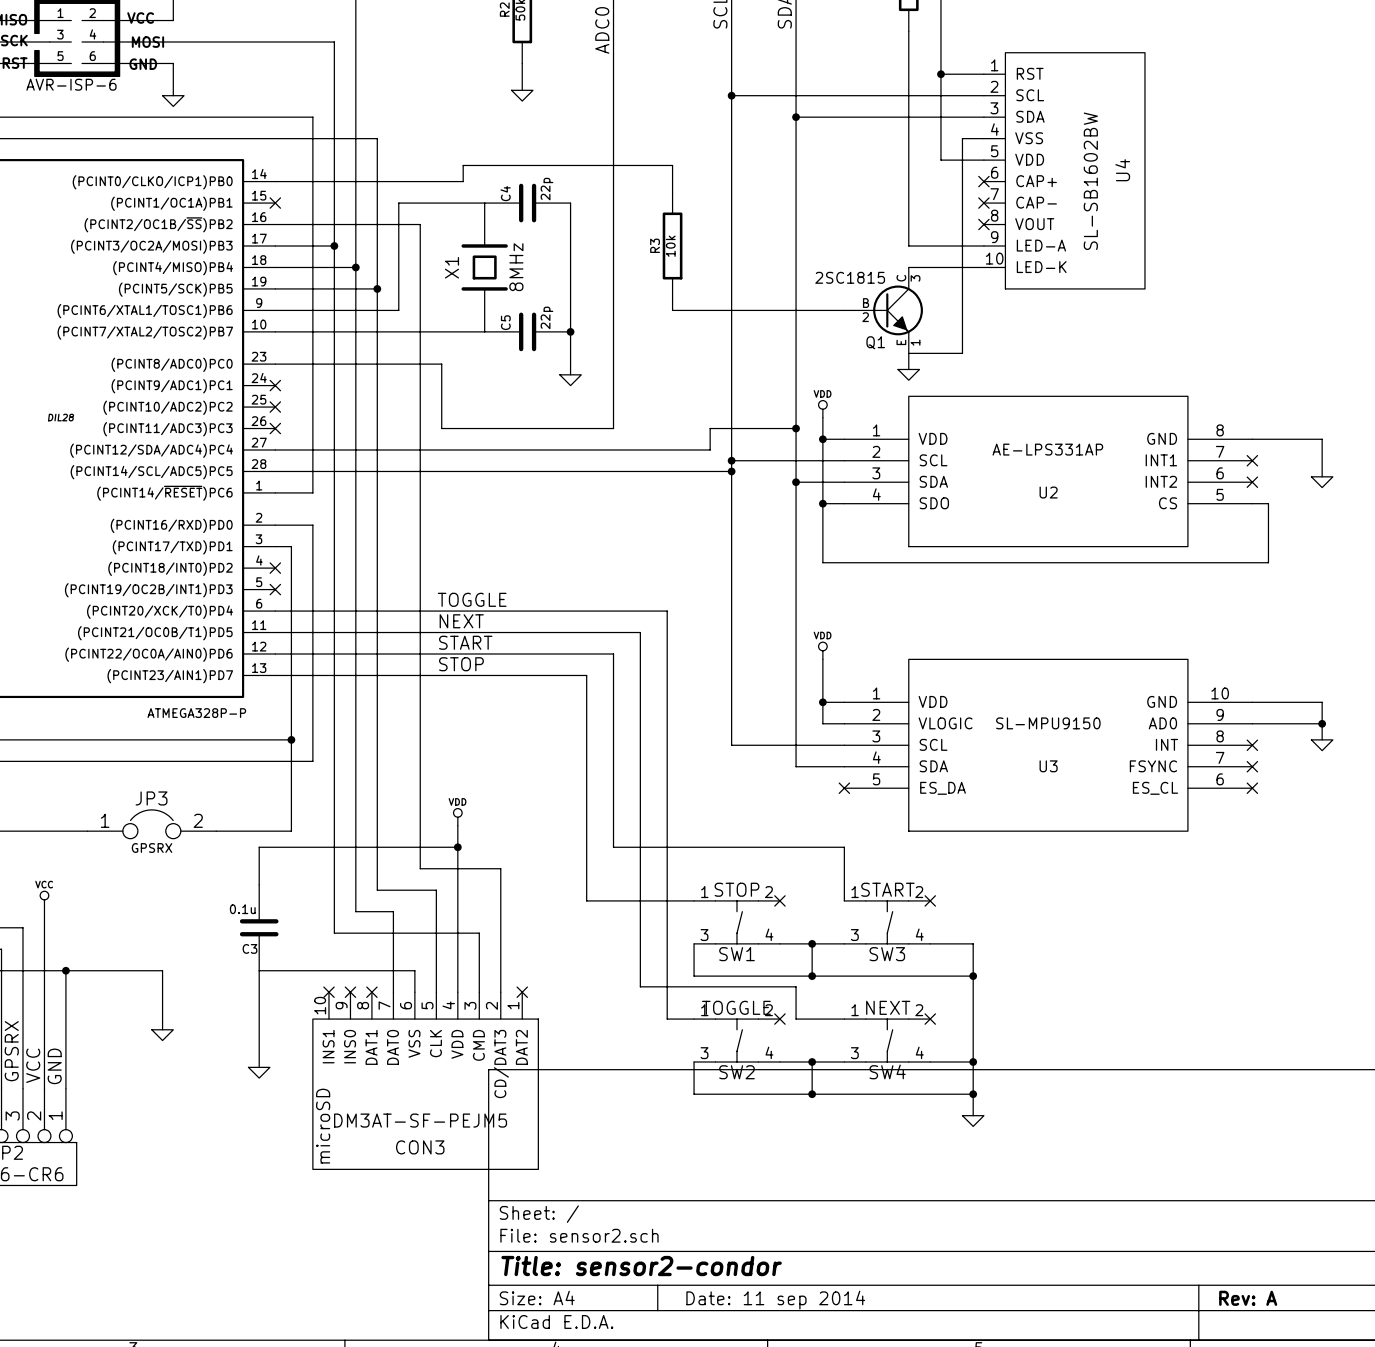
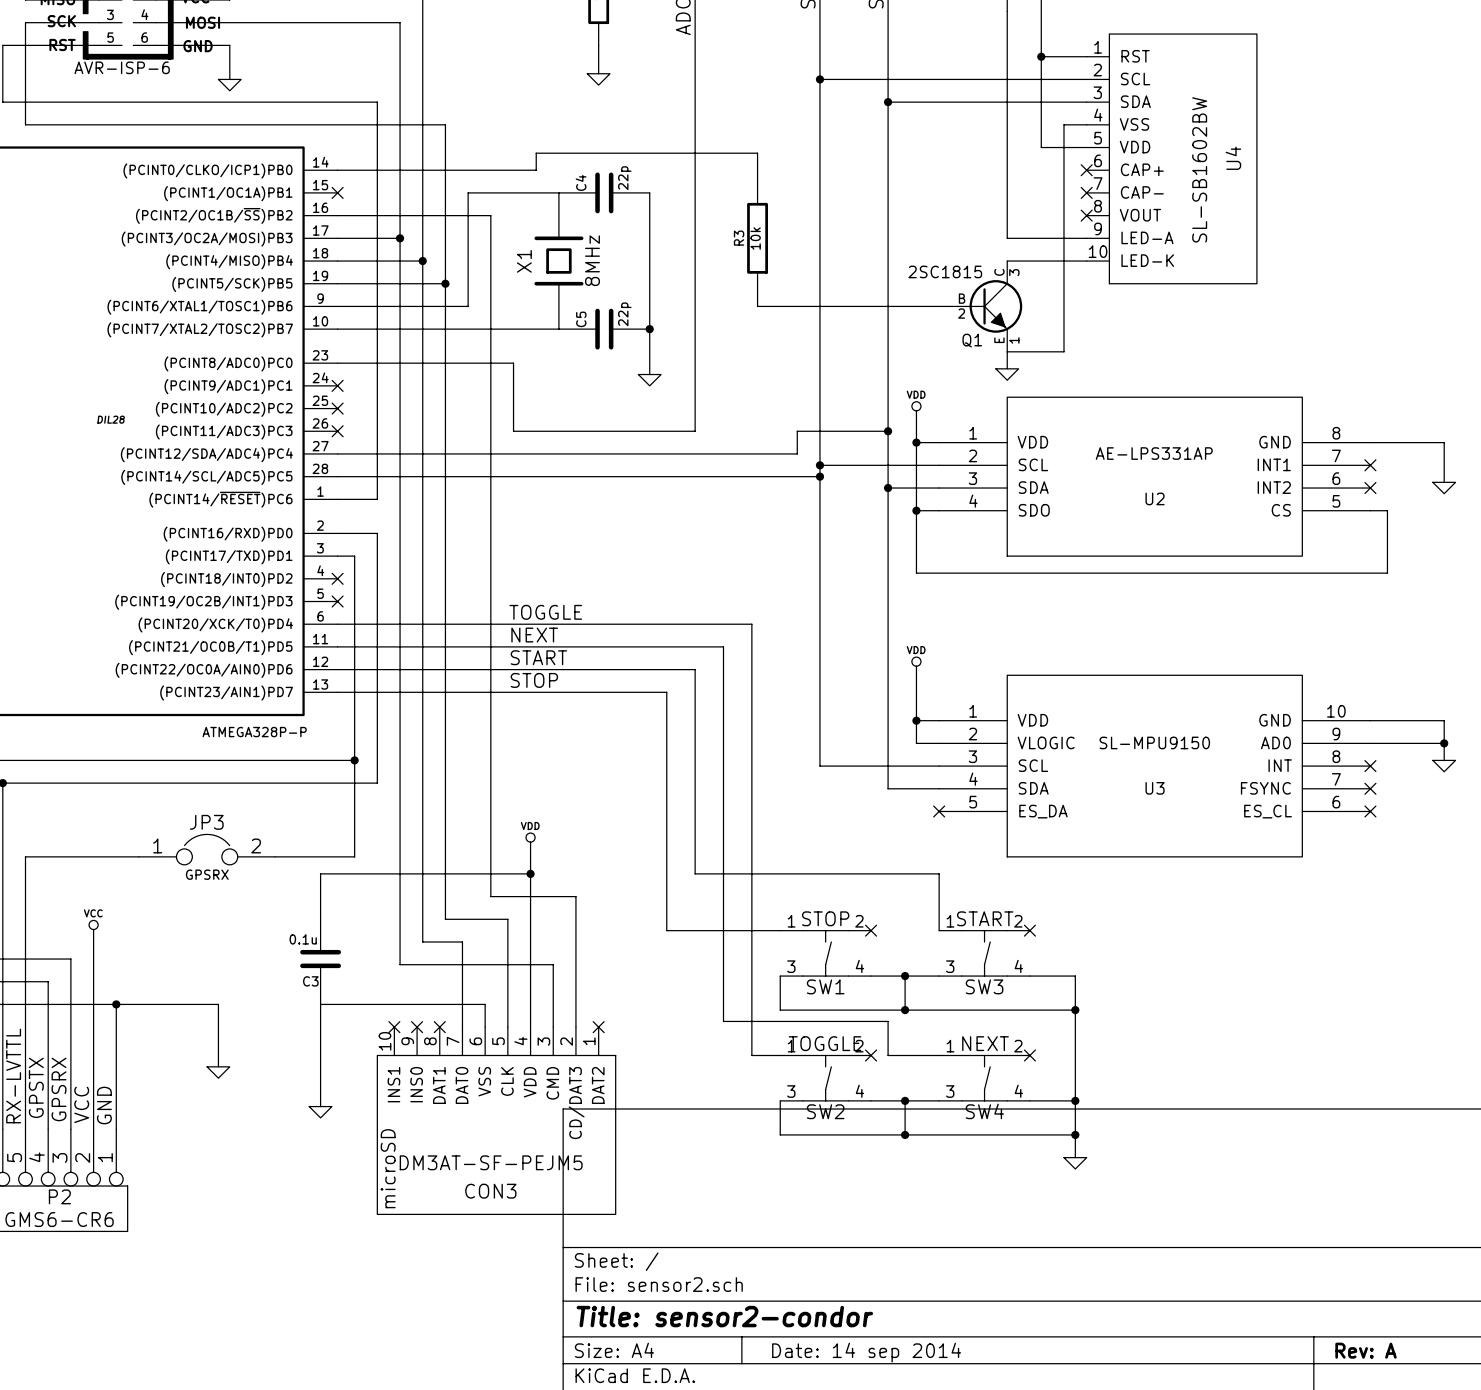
title block: Date: 11 sep 2014 (775, 1300) -> Date: 14 sep 2014 (866, 1352)

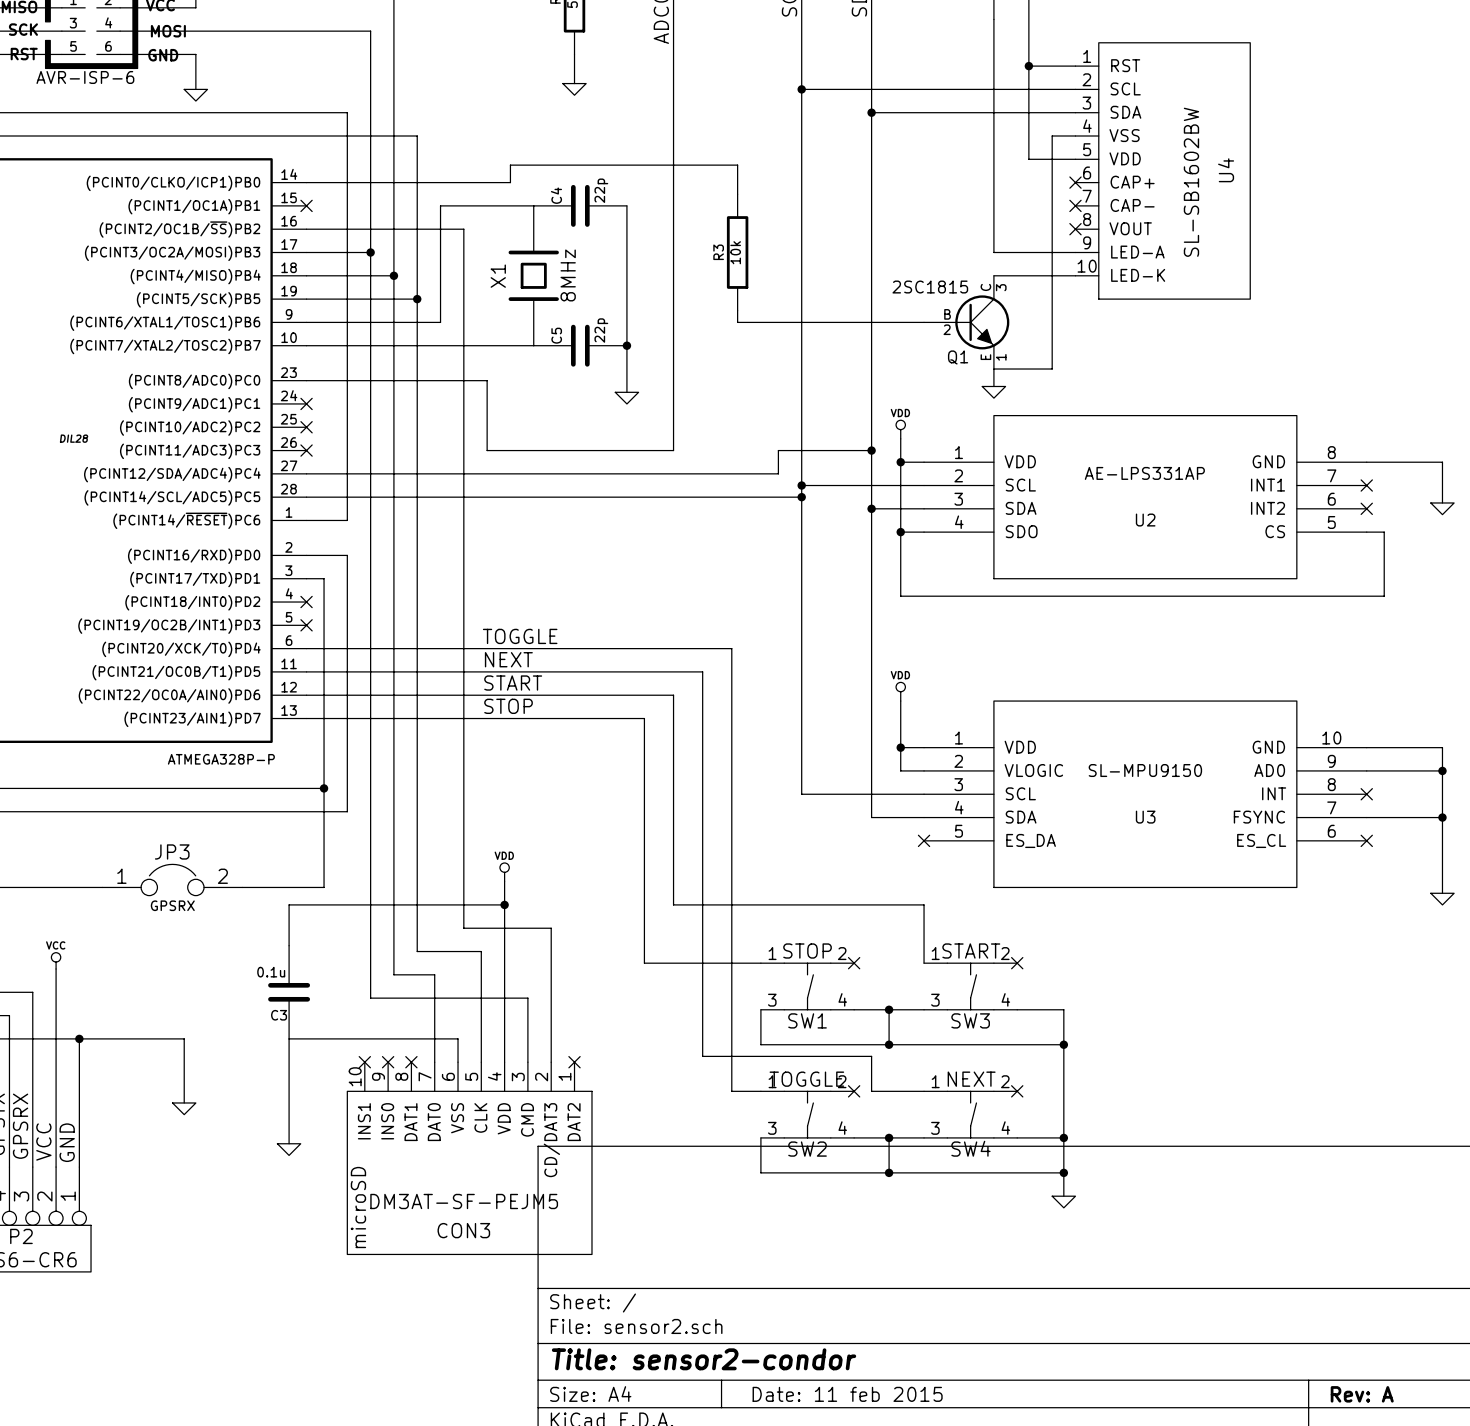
wire: none -> (1442, 788) (1442, 893)
power symbol position: (1444, 766) -> (1442, 899)
wire: none -> (1366, 817) (1442, 817)
no-connect mark: (1370, 788) -> none
junction: none -> (1442, 817)
title block: Date: 14 sep 2014 (866, 1352) -> Date: 11 feb 2015 (847, 1394)

